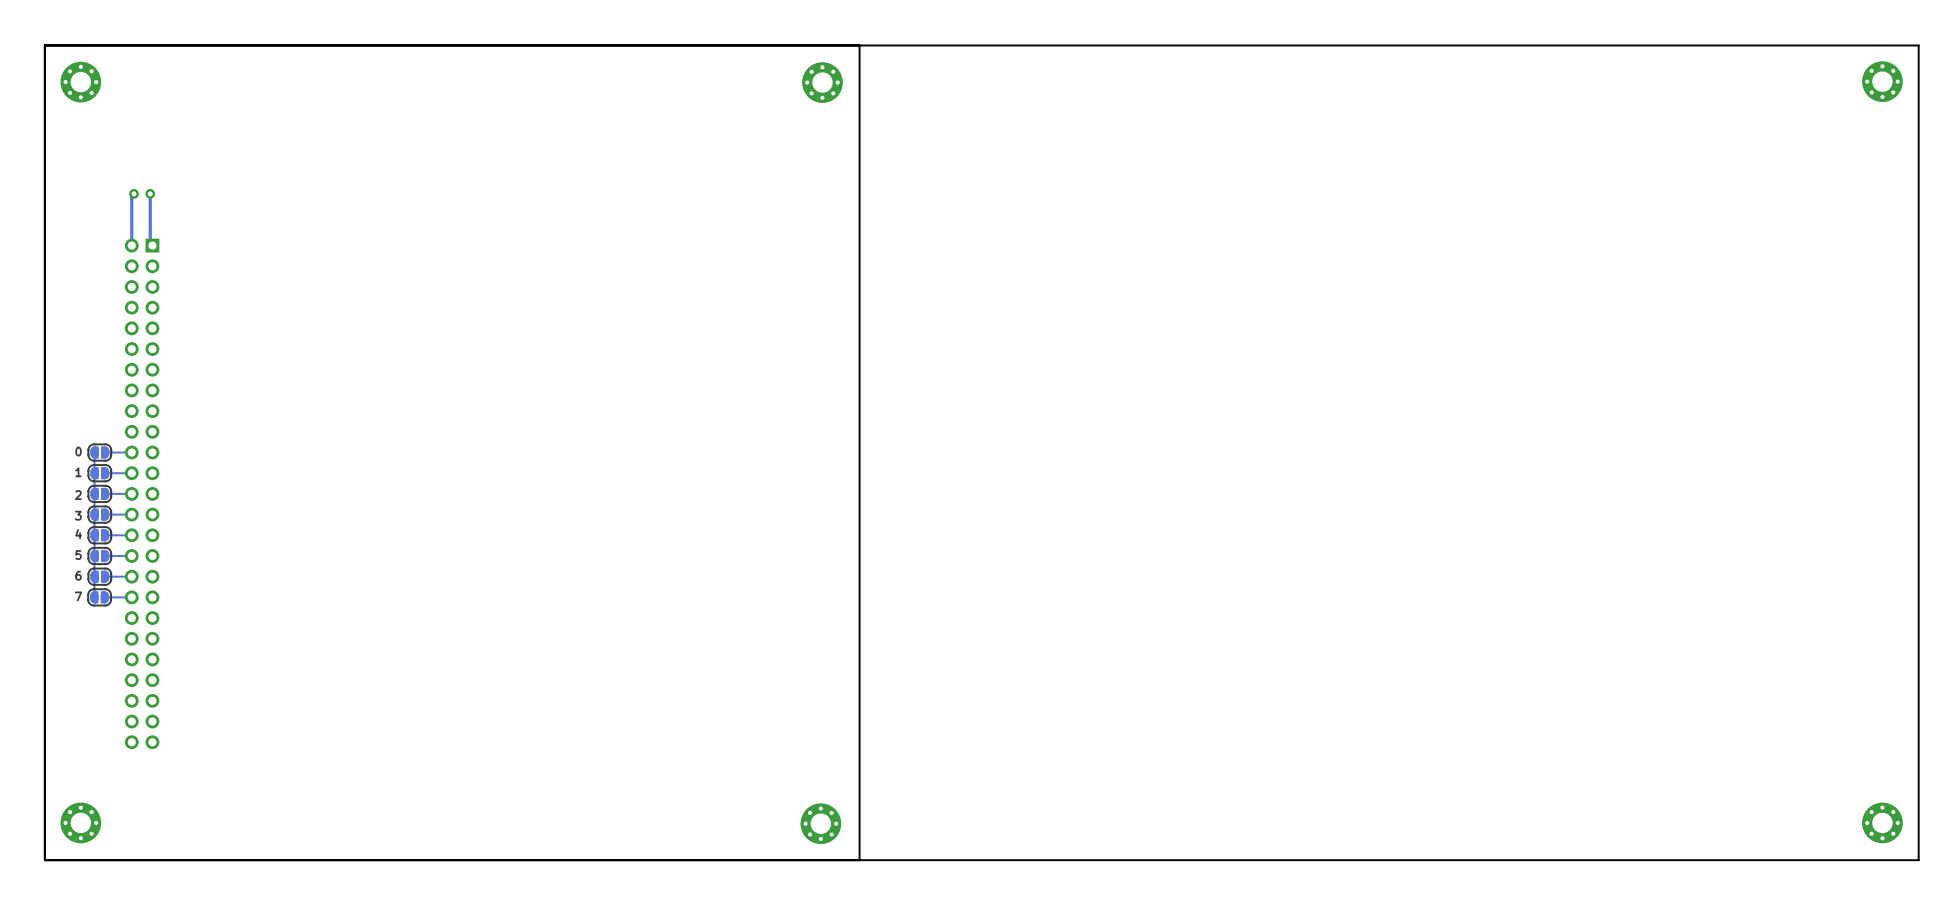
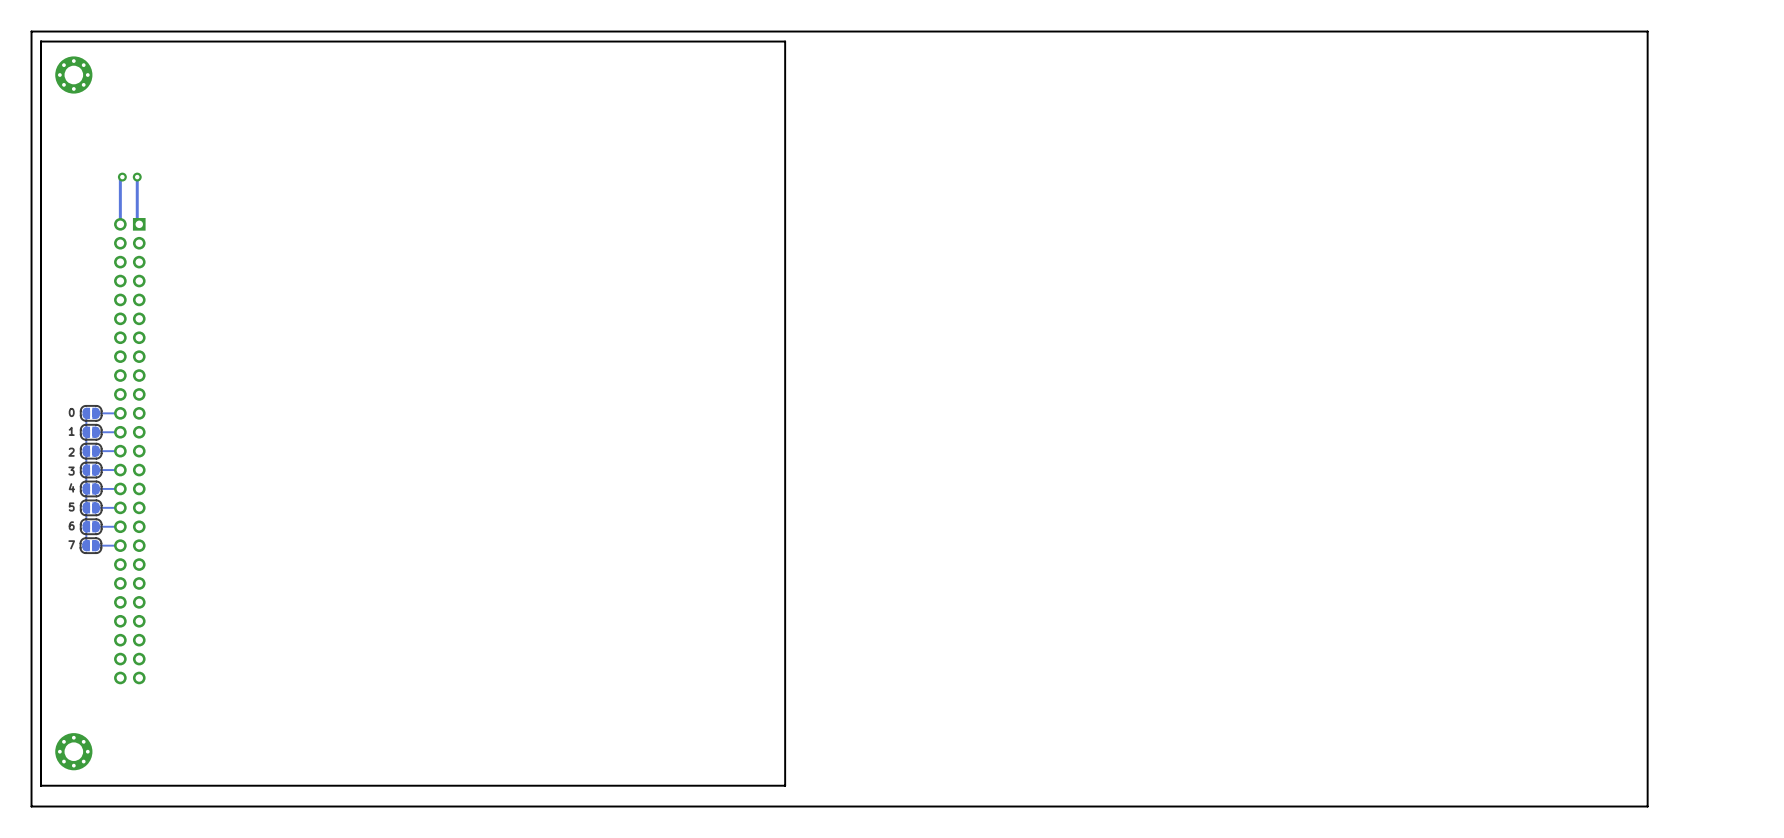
board edge: none -> (1647, 31) (31, 31) (31, 806) (1647, 806) (1647, 31)
board edge: (44, 45) (1918, 45) (1918, 860) (44, 860) -> none
part: (1882, 81) -> none
part: (822, 82) -> none
part: (1882, 822) -> none
part: (820, 823) -> none

